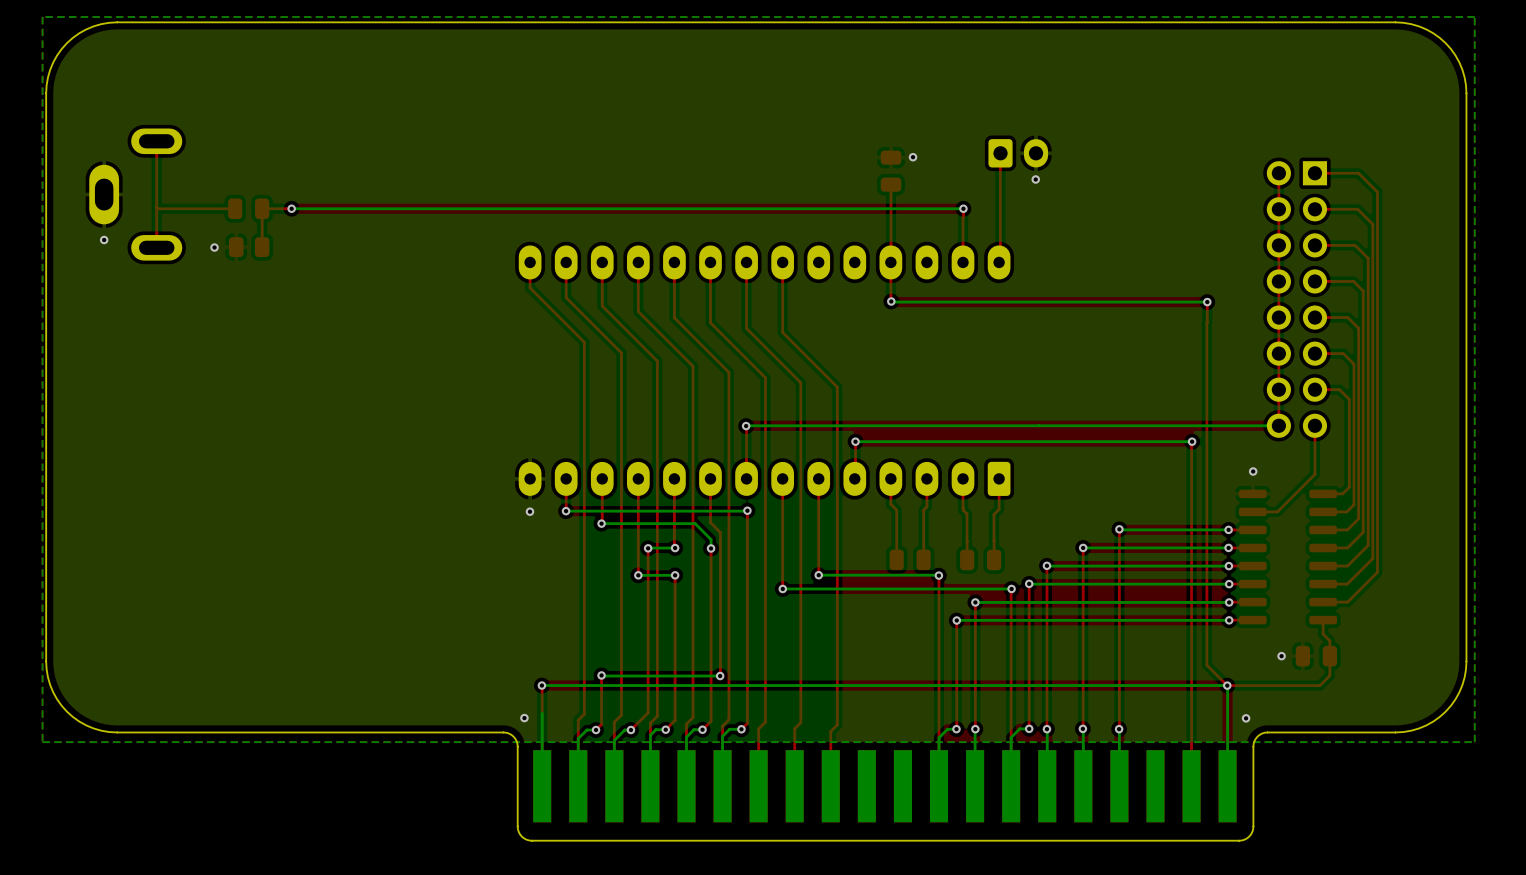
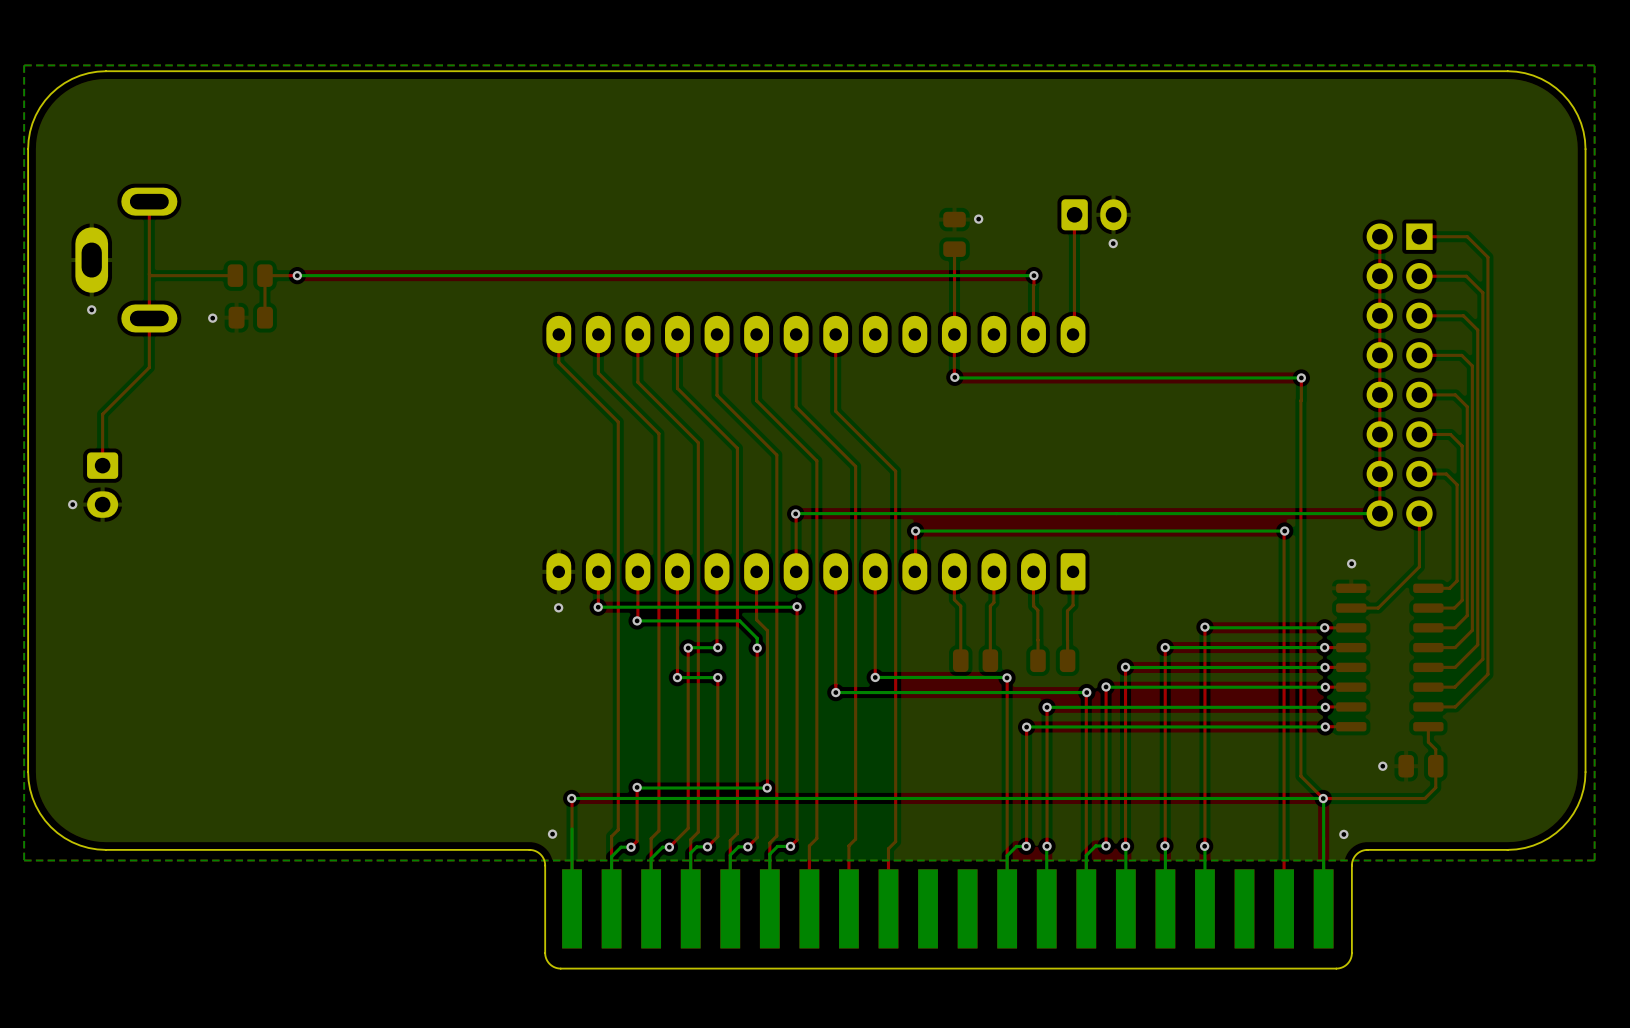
top track: none -> (149, 318) (149, 367) (102, 414) (102, 465)
part: none -> (102, 485)
via: none -> (72, 504)

